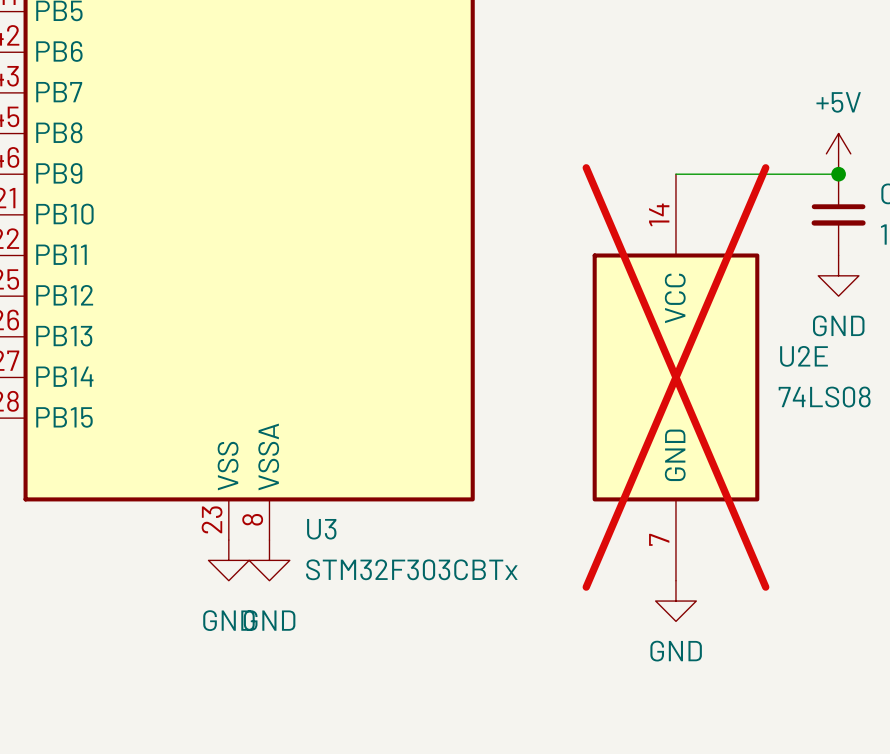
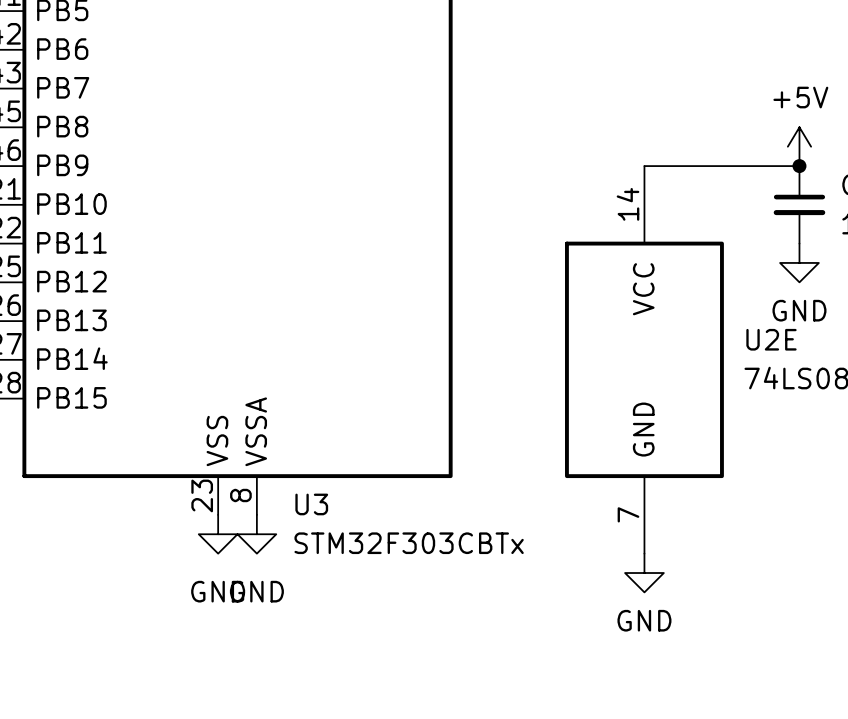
U2E do-not-place cross: (675, 377) -> none

